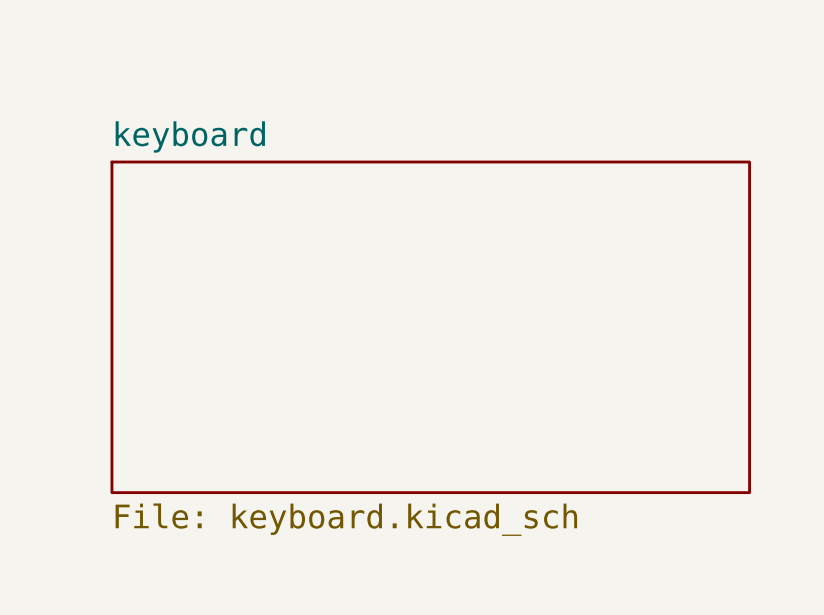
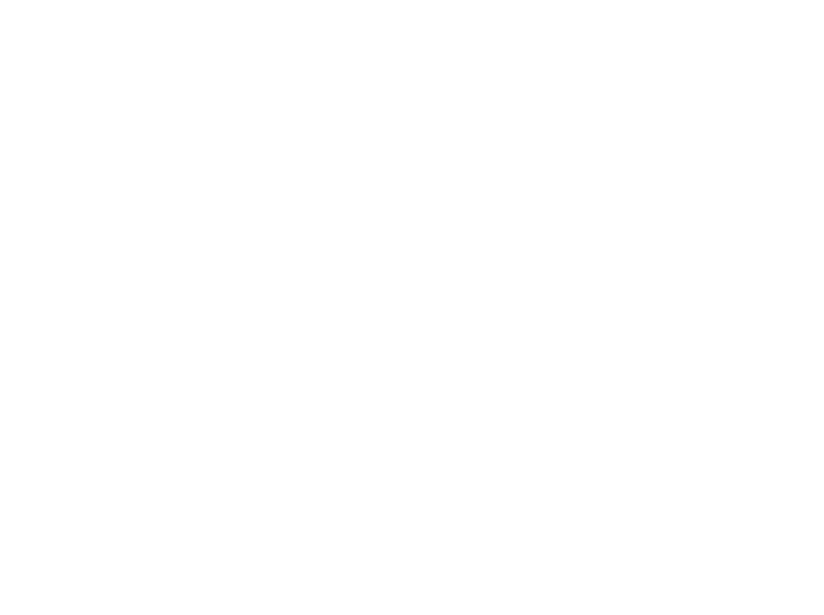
sheet keyboard: File: keyboard.kicad_sch (430, 327) -> none

